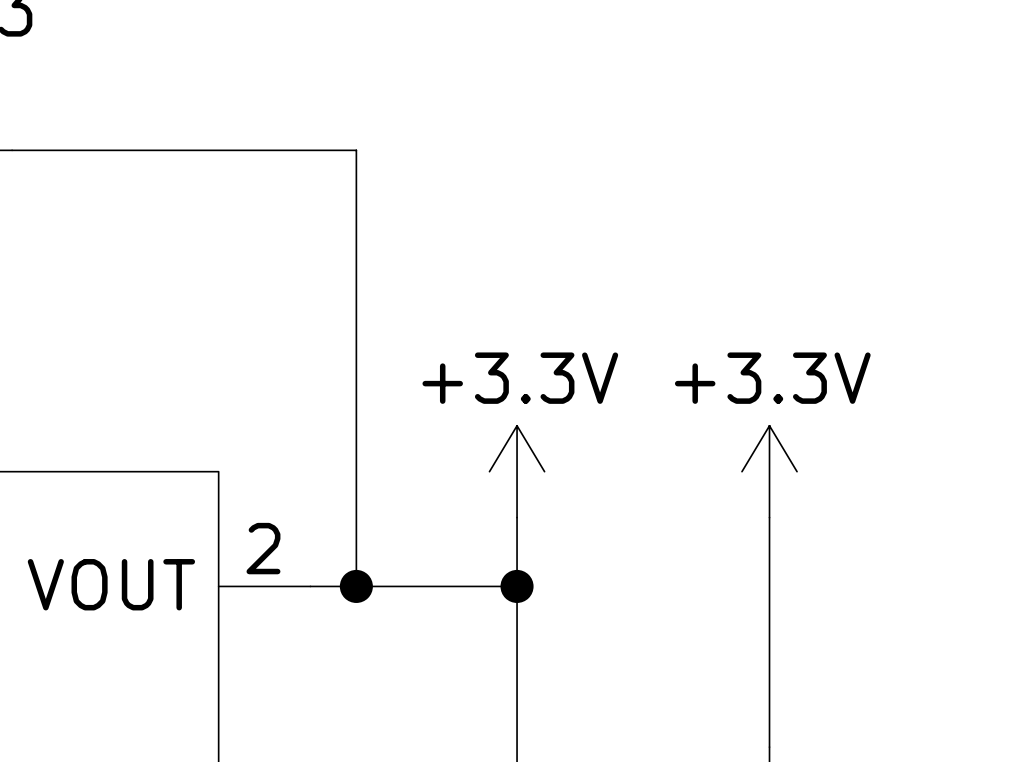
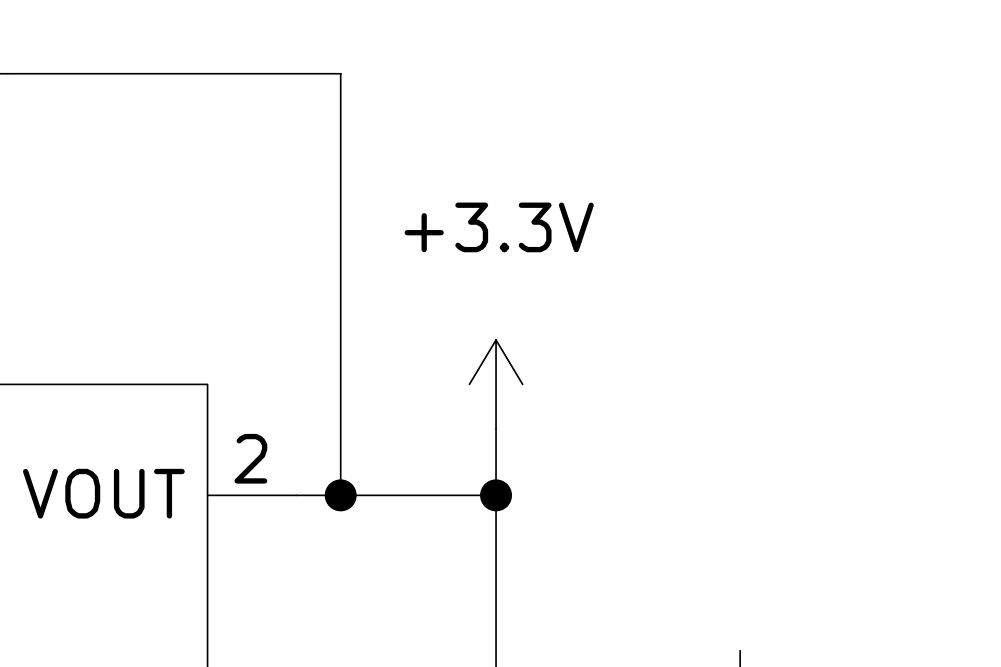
power symbol text position: +3.3V (520, 378) -> +3.3V (499, 227)
power symbol: +3.3V (769, 471) -> none
wire: (769, 517) (769, 747) -> none

